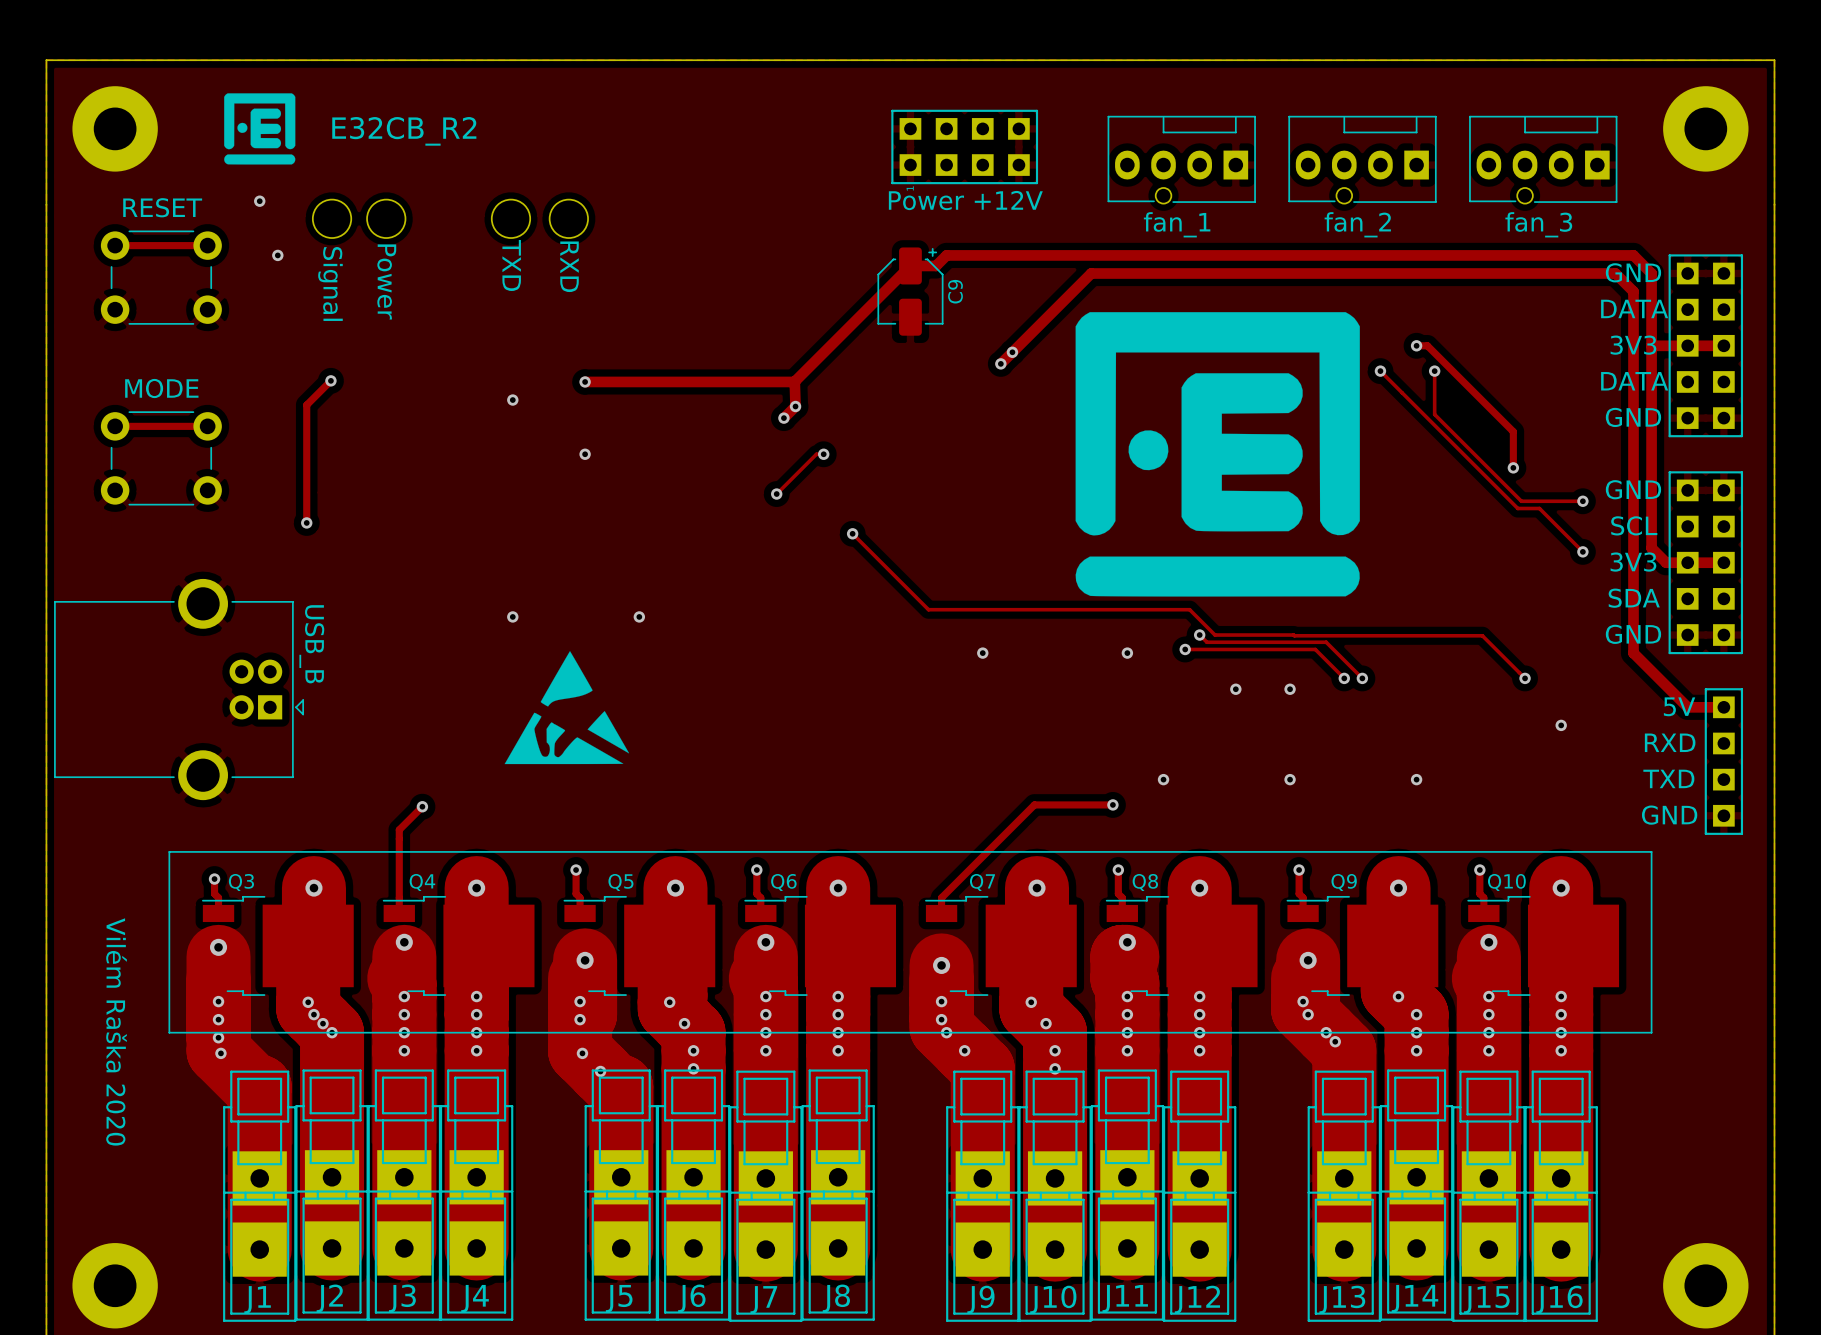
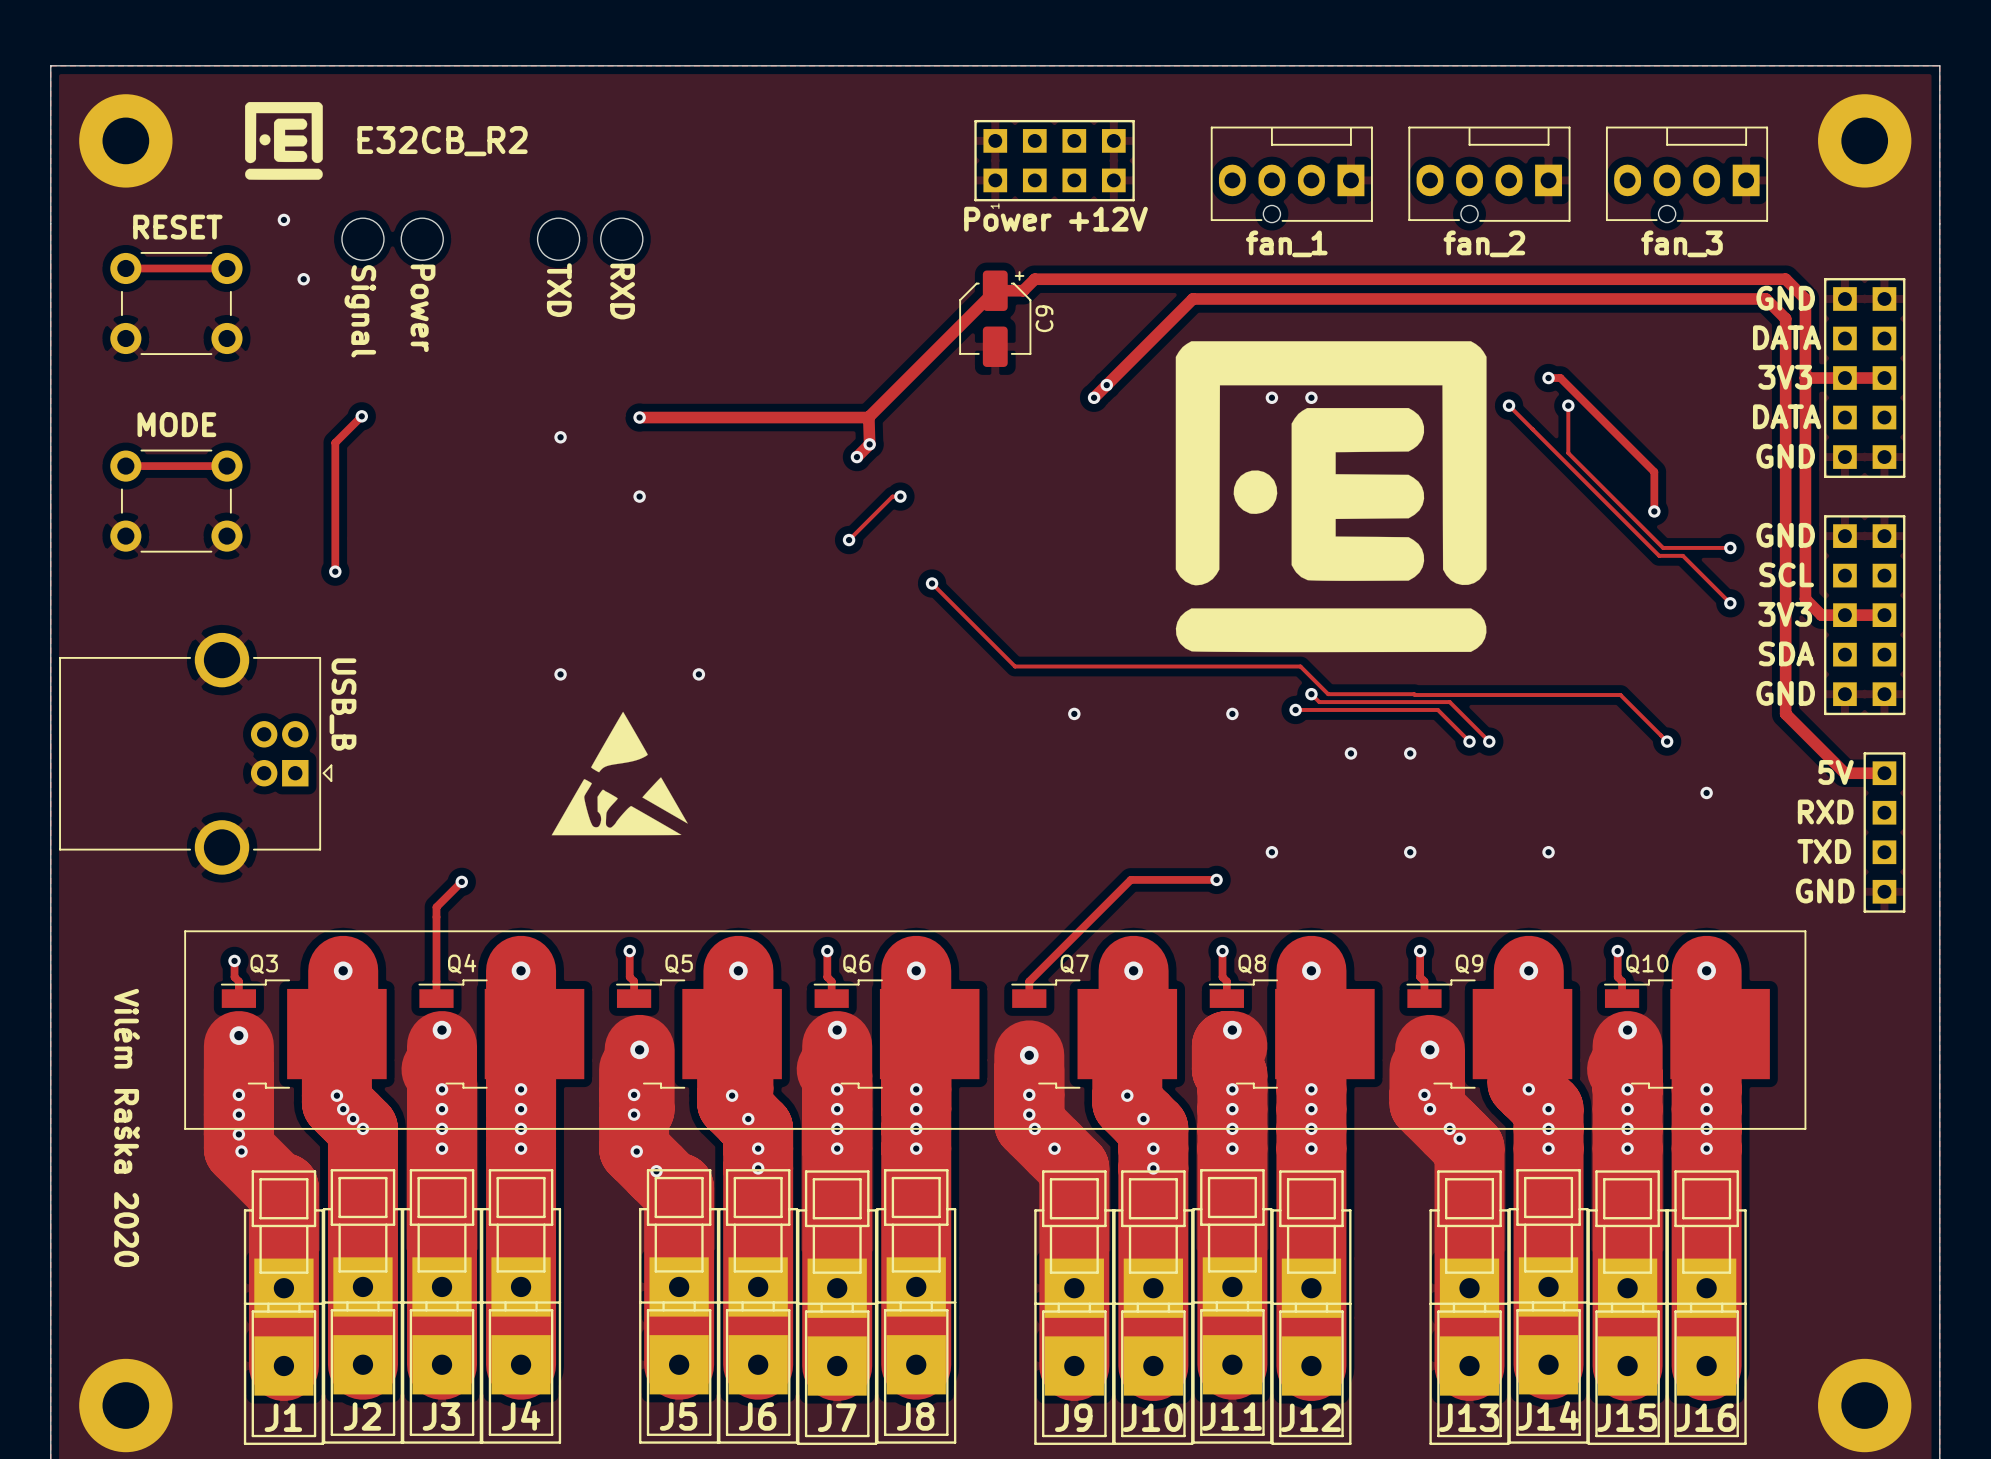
via: none -> (1271, 397)
via: none -> (1311, 397)

